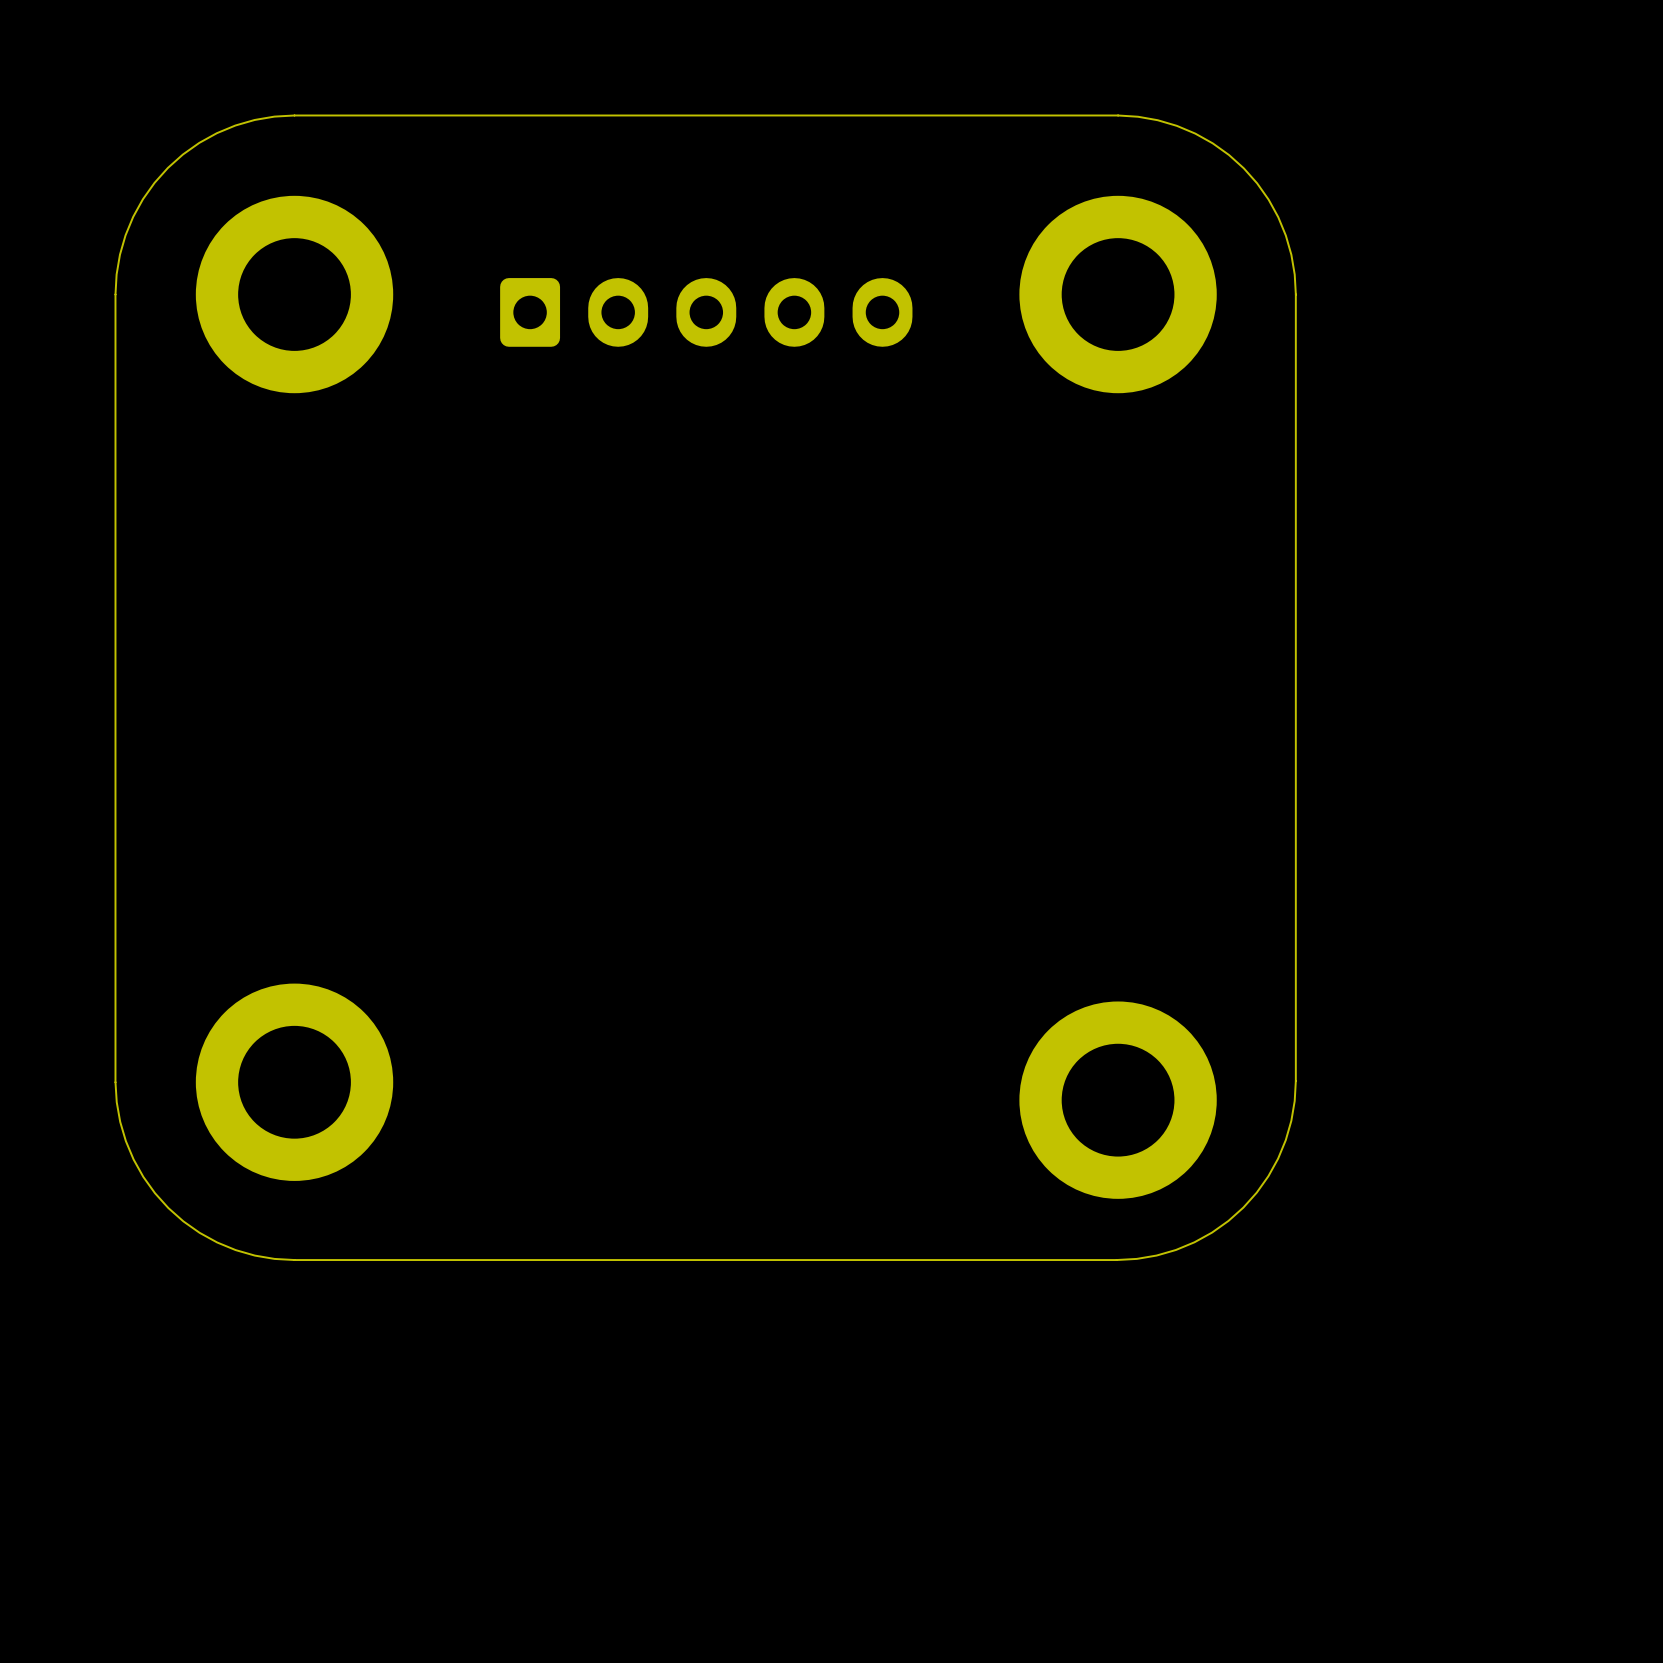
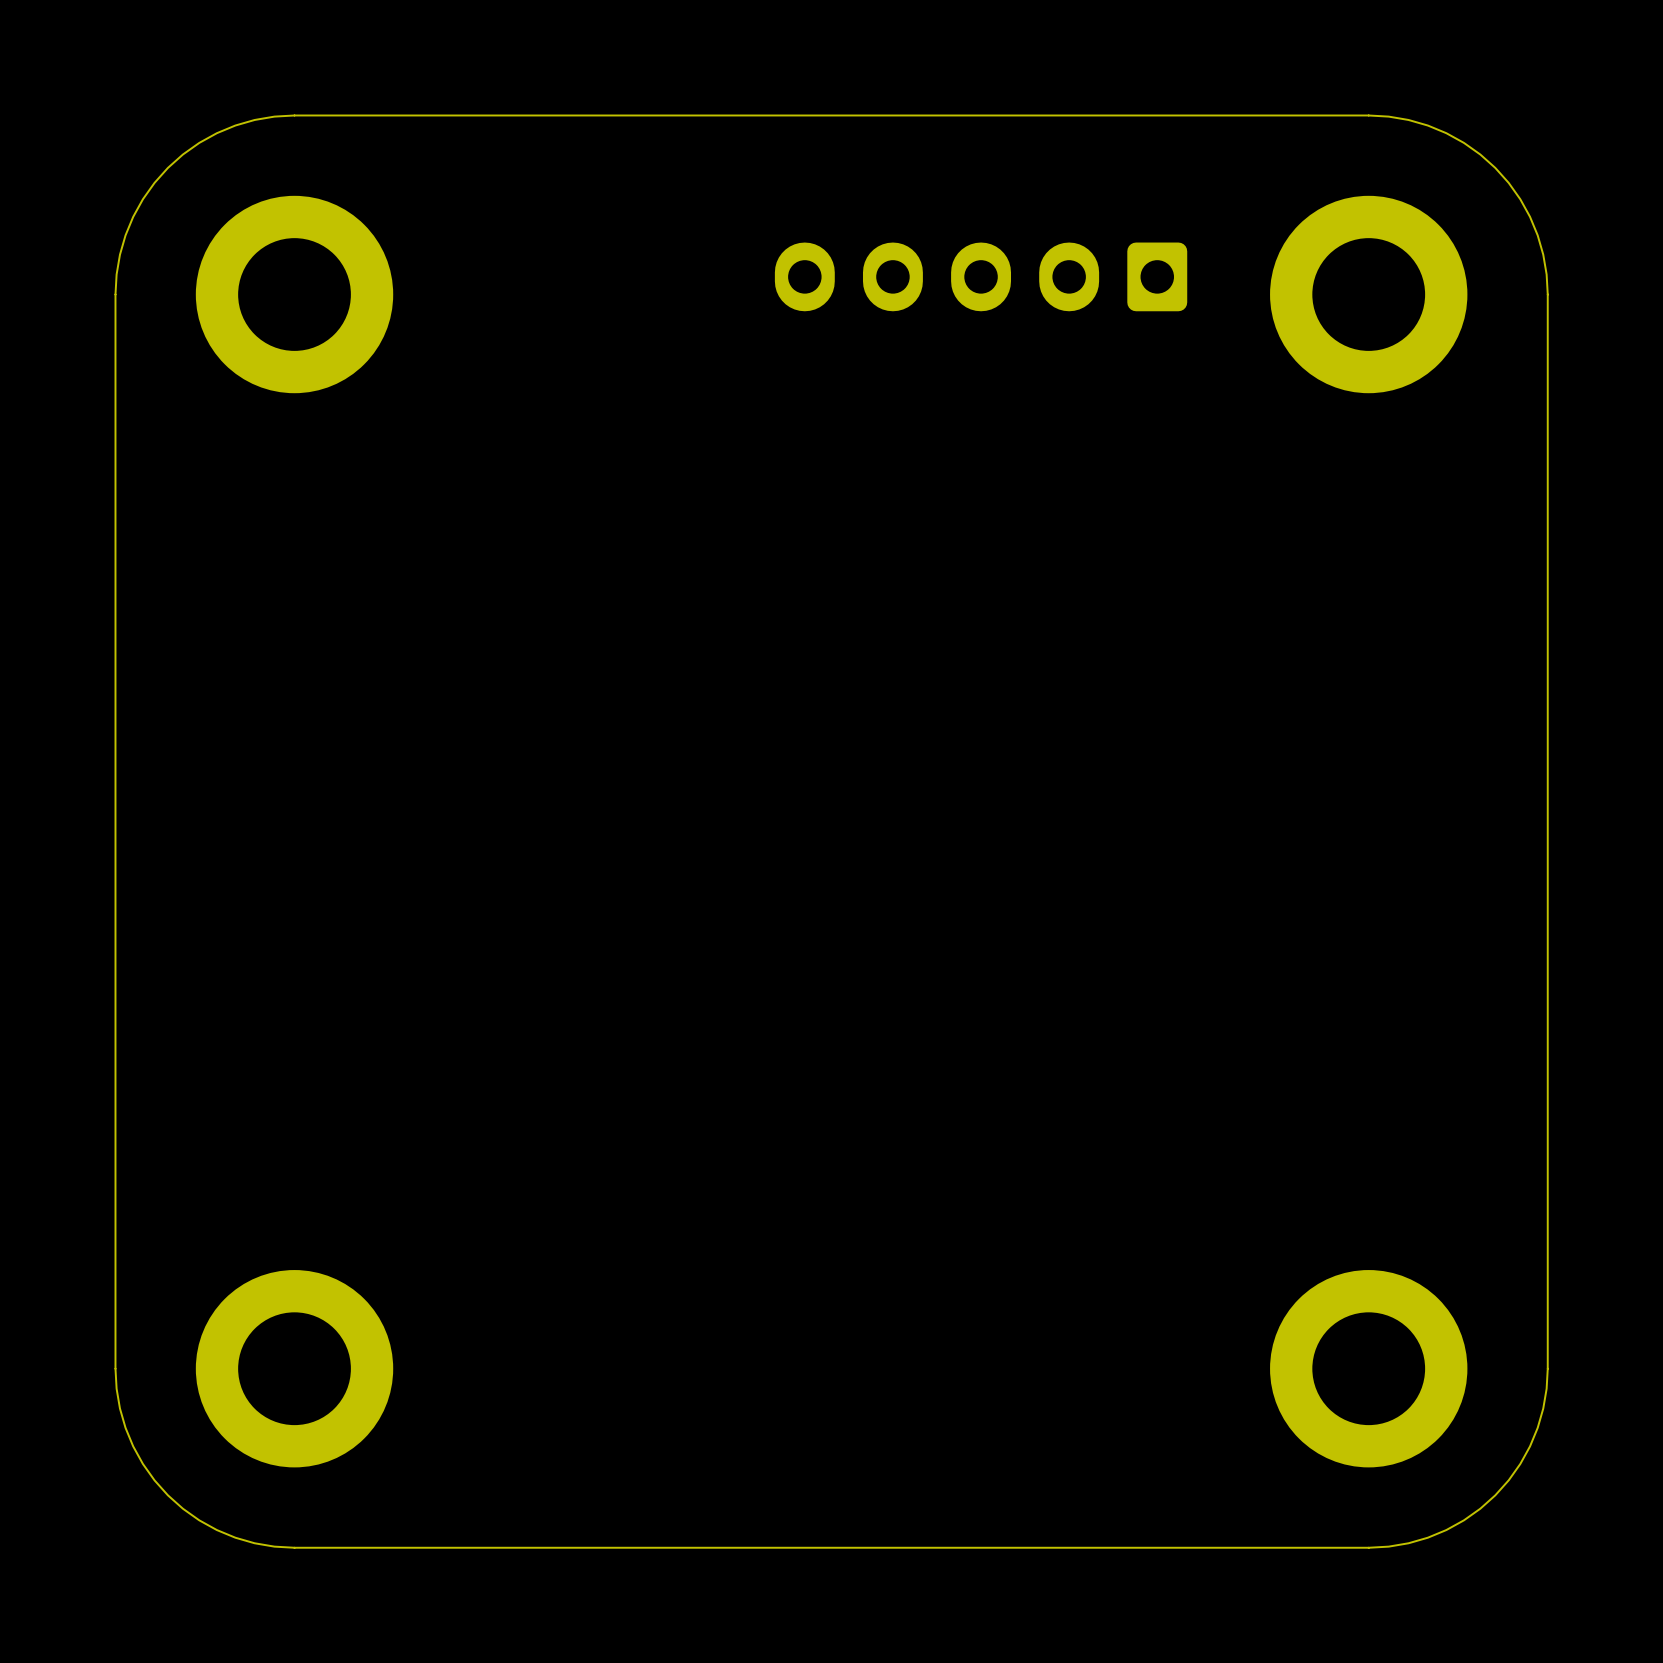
board edge: (1118, 115) (1138, 116) (1176, 125) (1212, 143) (1229, 154) (1257, 183) (1278, 217) (1285, 235) (1294, 274) (1295, 1080) (1294, 1101) (1285, 1140) (1268, 1176) (1243, 1207) (1212, 1232) (1175, 1249) (1136, 1258) (1116, 1260) (274, 1258) (235, 1250) (217, 1242) (199, 1232) (168, 1208) (143, 1176) (125, 1141) (116, 1102) (115, 1082) -> (1118, 115) (1368, 115) (1408, 119) (1427, 125) (1463, 142) (1495, 167) (1520, 199) (1530, 216) (1543, 254) (1547, 294) (1547, 1368) (1543, 1408) (1530, 1446) (1520, 1463) (1495, 1495) (1463, 1520) (1446, 1530) (1408, 1543) (1368, 1547) (294, 1547) (254, 1543) (235, 1537) (199, 1520) (167, 1495) (142, 1463) (133, 1446) (119, 1408) (115, 1368) (115, 1082)
part position: (1118, 294) -> (1368, 294)
part rotation: 0° (706, 312) -> 180° (981, 276)
part position: (706, 312) -> (981, 276)
part position: (294, 1082) -> (294, 1368)
part position: (1118, 1100) -> (1368, 1368)

